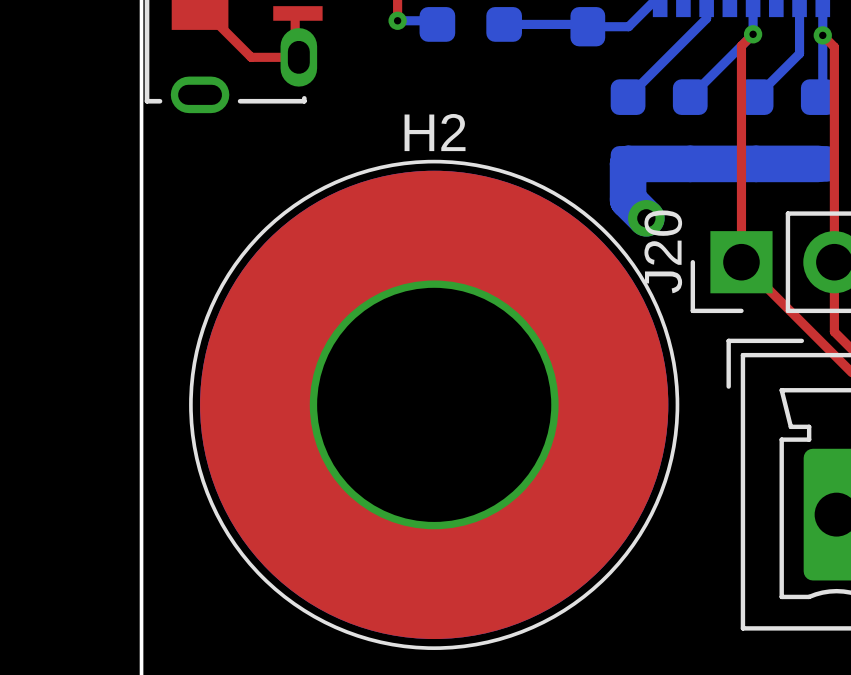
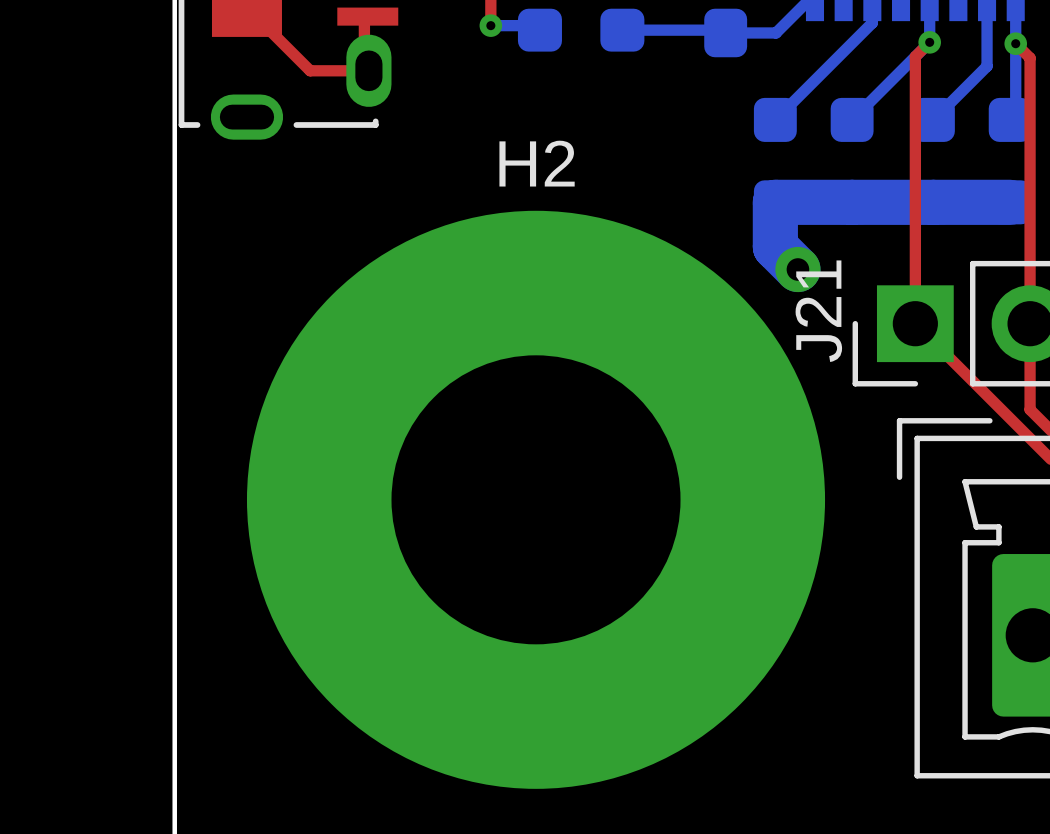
H2 footprint: [189, 159, 680, 650] -> [246, 210, 826, 789]
J20 name: J20 (663, 251) -> J21 (818, 311)

